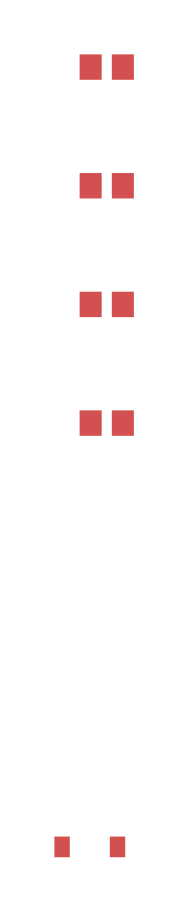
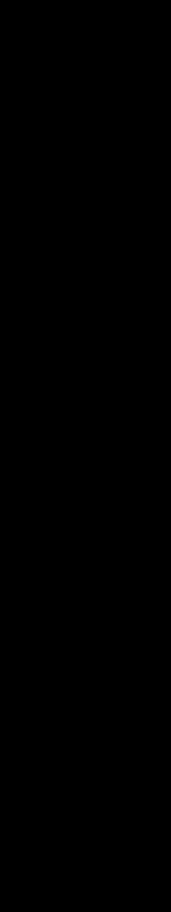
part: (106, 67) -> none
part: (106, 185) -> none
part: (106, 304) -> none
part: (106, 423) -> none
part: (89, 846) -> none

